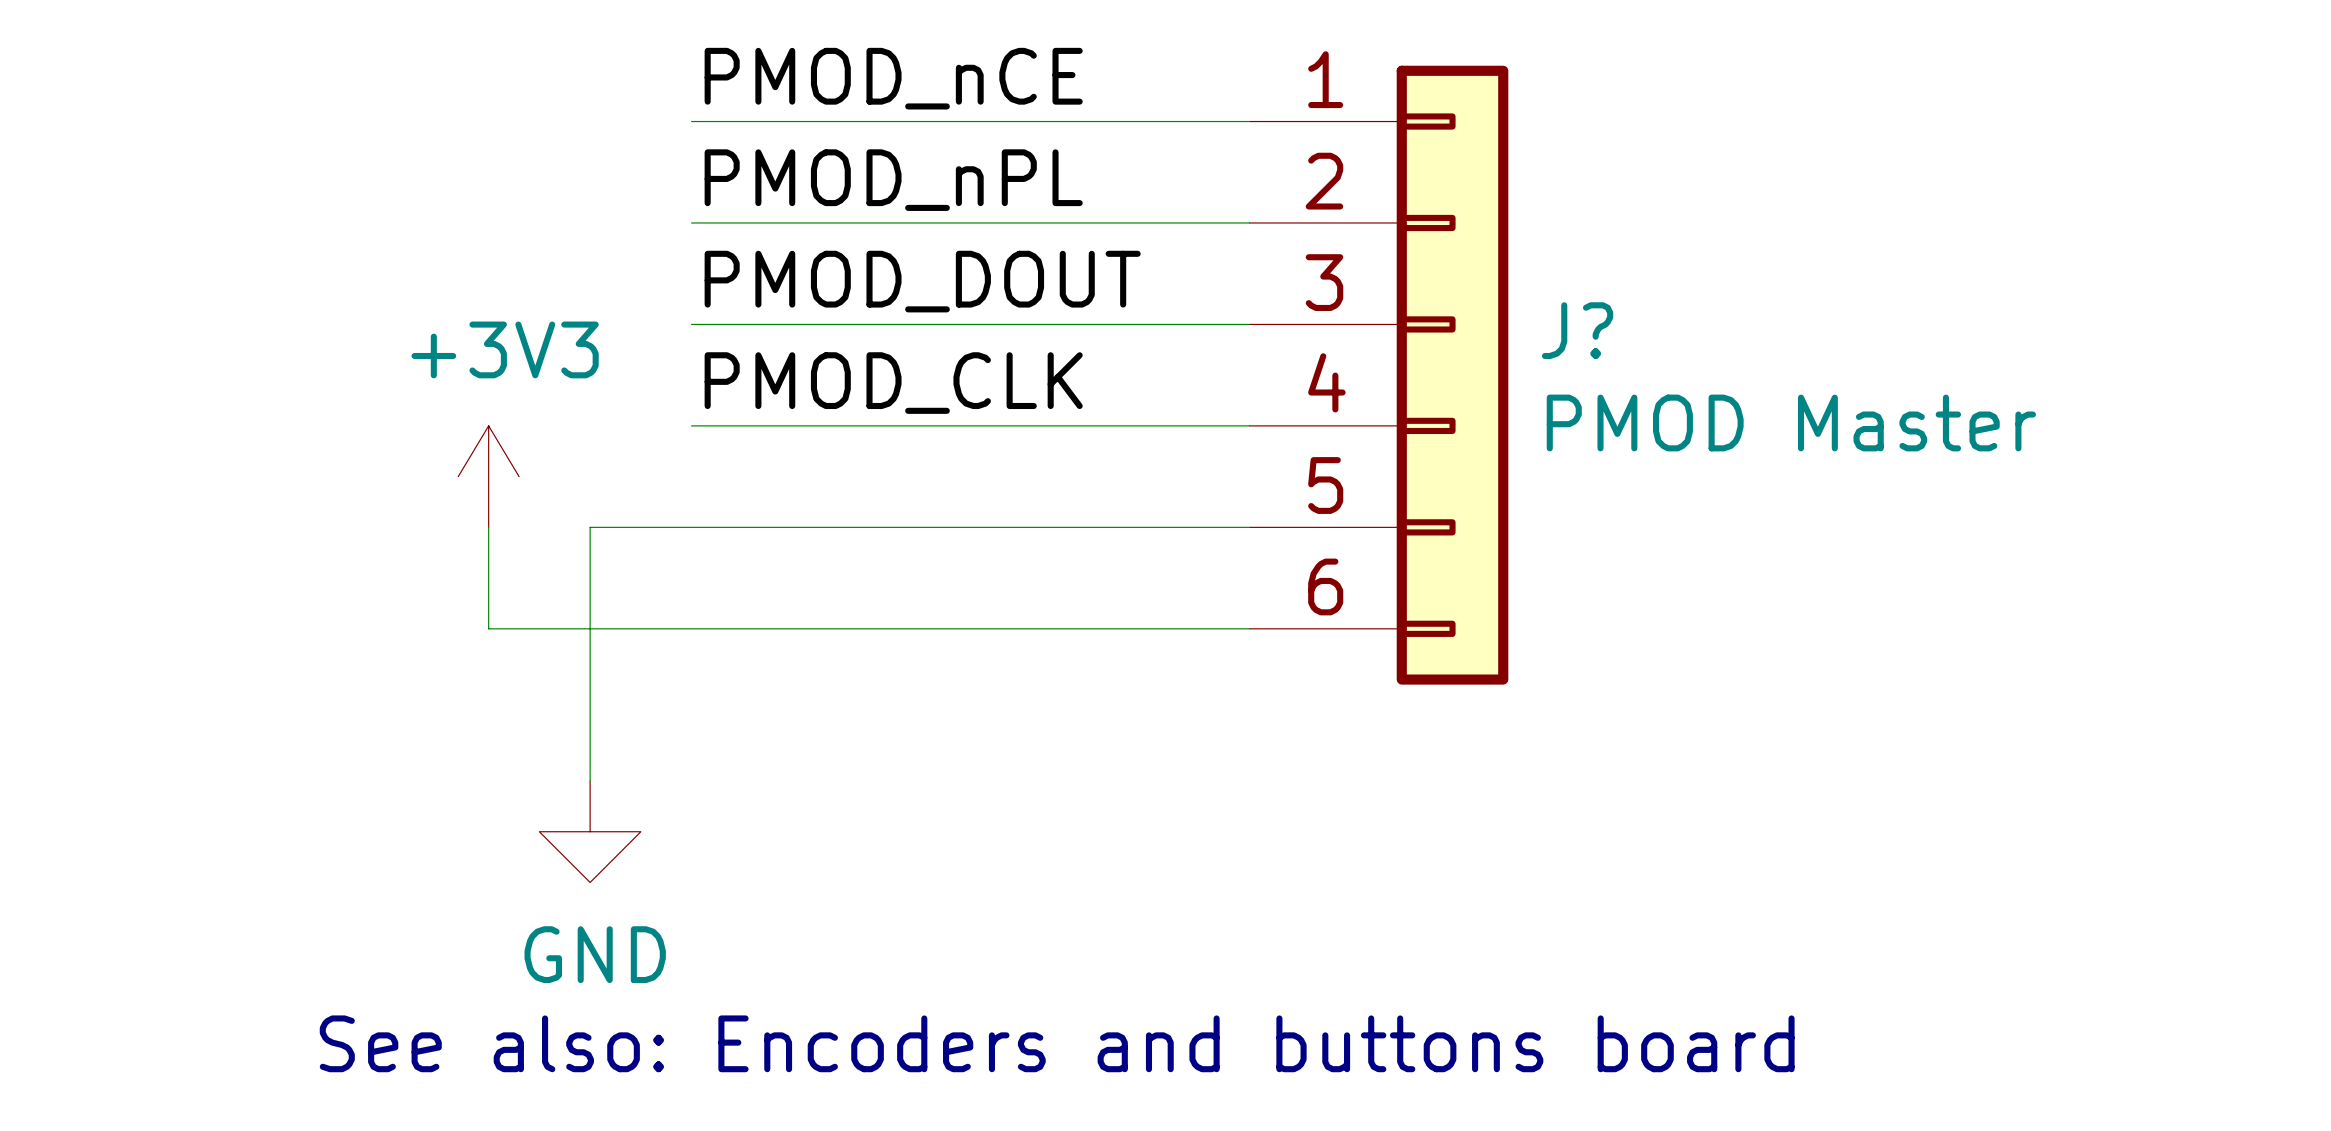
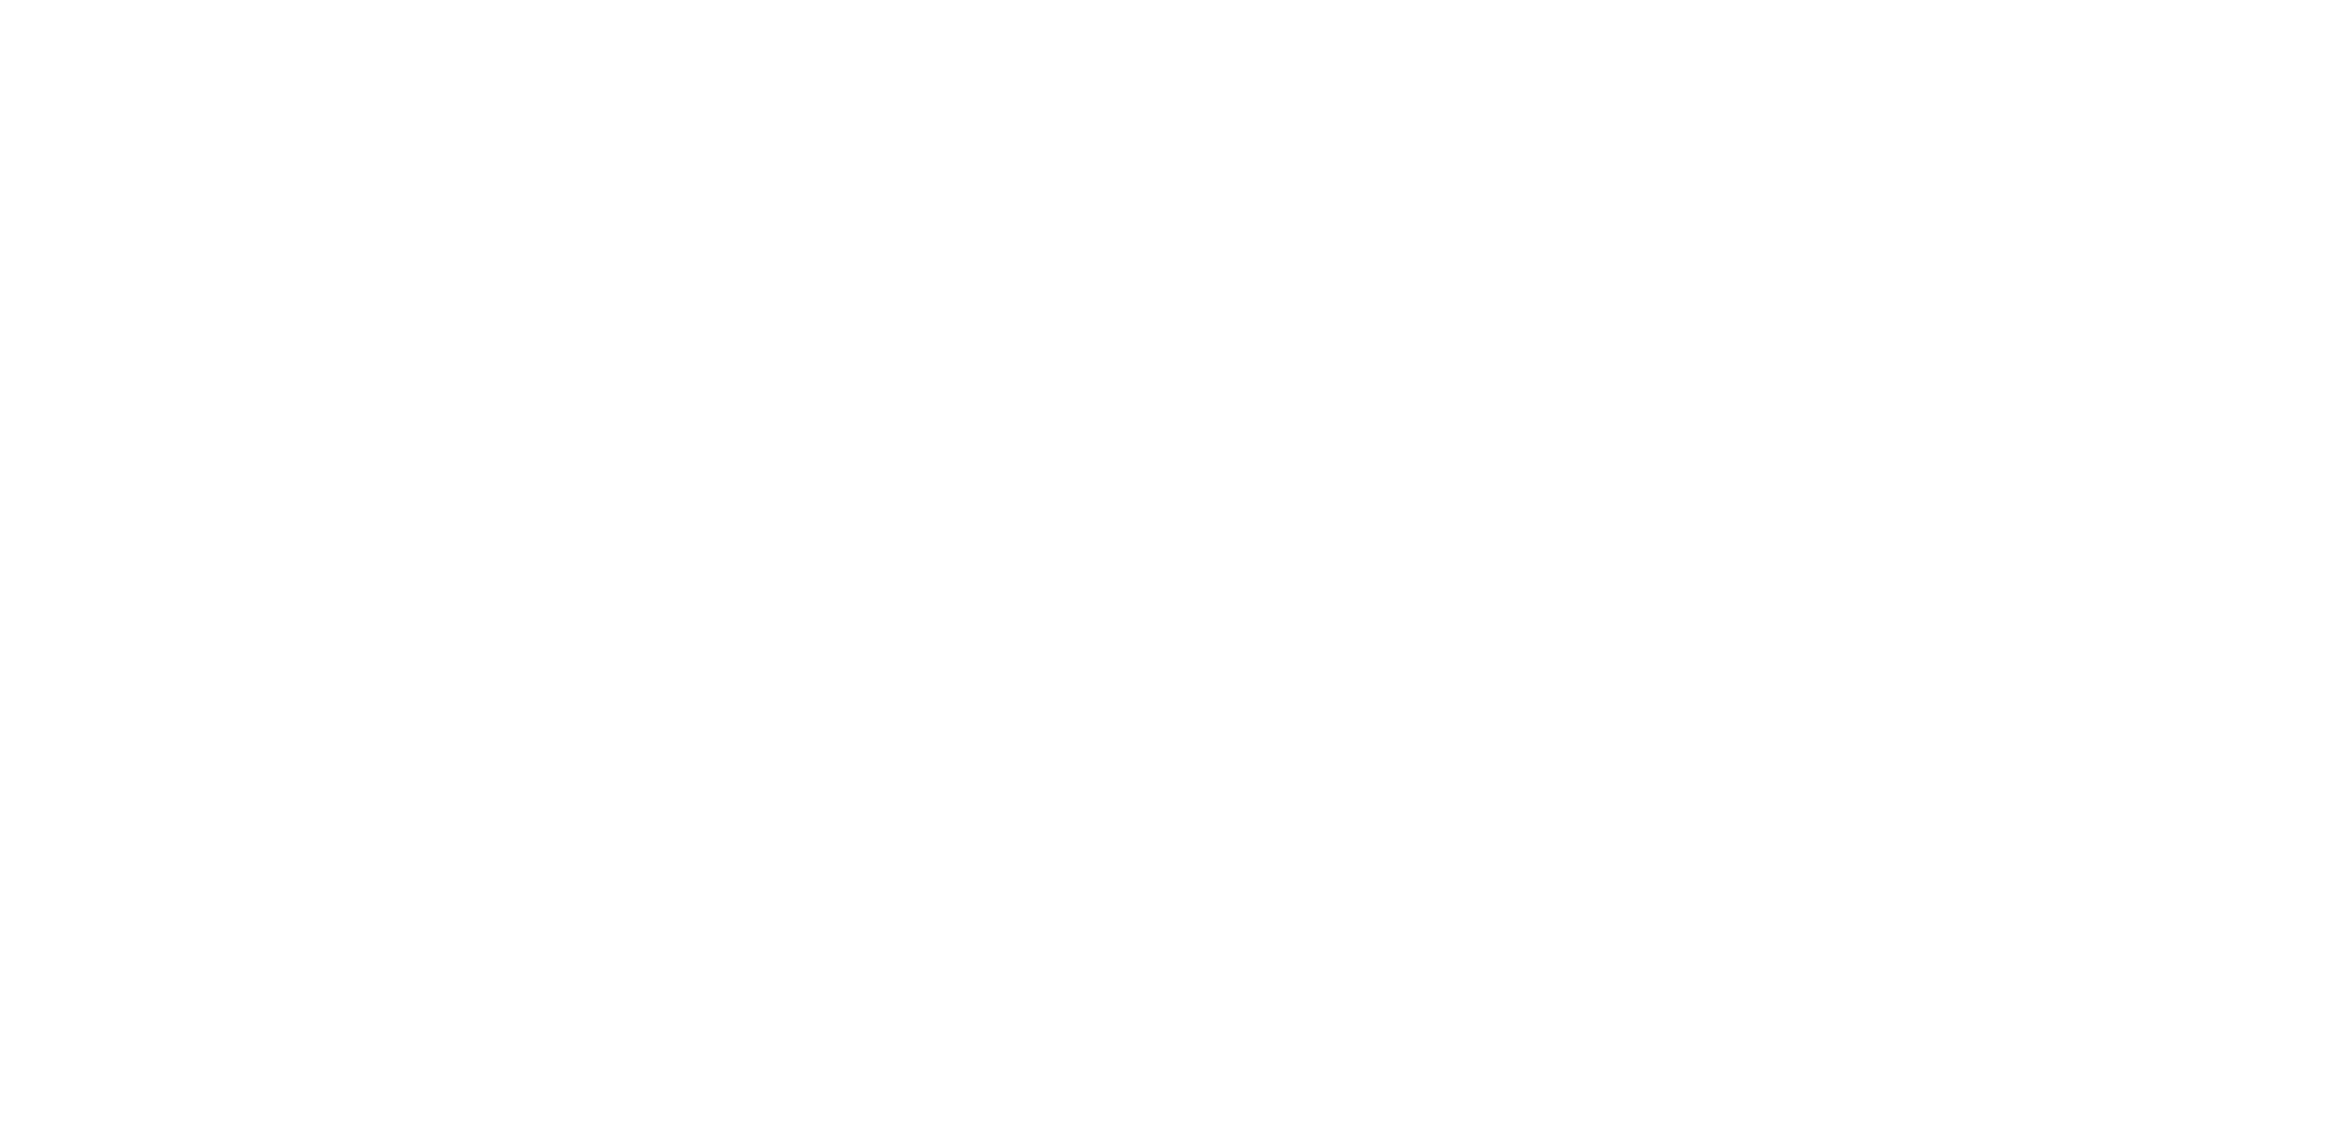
label: PMOD_nCE (893, 78) -> none
wire: (691, 121) (1249, 121) -> none
label: PMOD_nPL (893, 180) -> none
wire: (691, 222) (1249, 222) -> none
label: PMOD_DOUT (922, 281) -> none
wire: (691, 324) (1249, 324) -> none
J?: PMOD Master (1378, 375) -> none
label: PMOD_CLK (893, 383) -> none
wire: (691, 425) (1249, 425) -> none
power symbol: +3V3 (488, 476) -> none
wire: (488, 527) (488, 628) (1249, 628) -> none
wire: (1249, 527) (590, 527) (590, 781) -> none
power symbol: GND (590, 831) -> none
text: See also: Encoders and buttons board (1057, 1043) -> none

